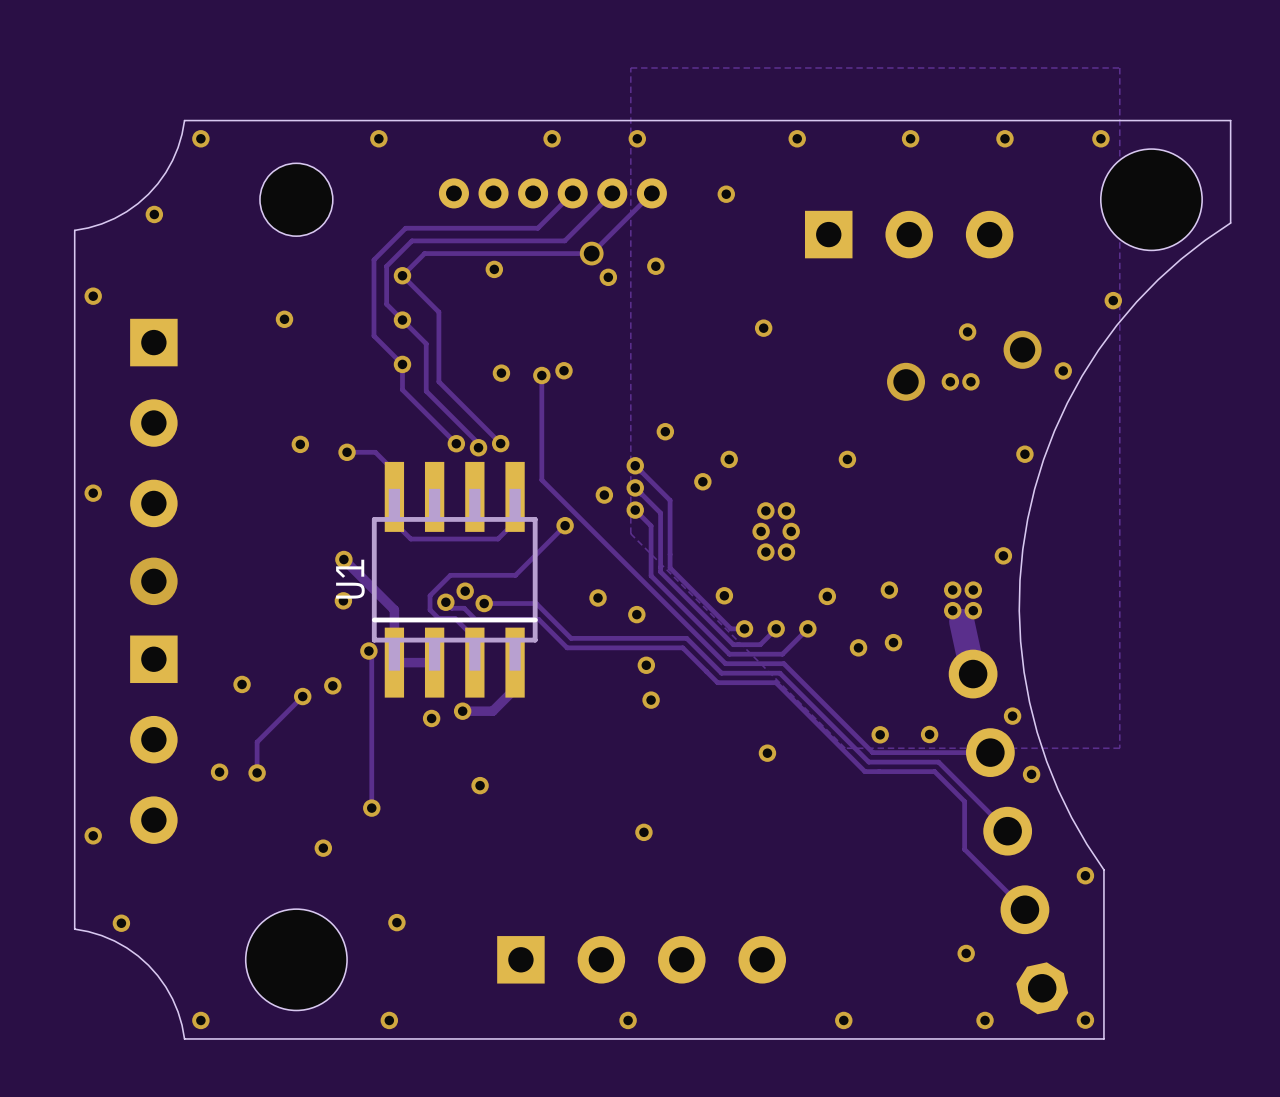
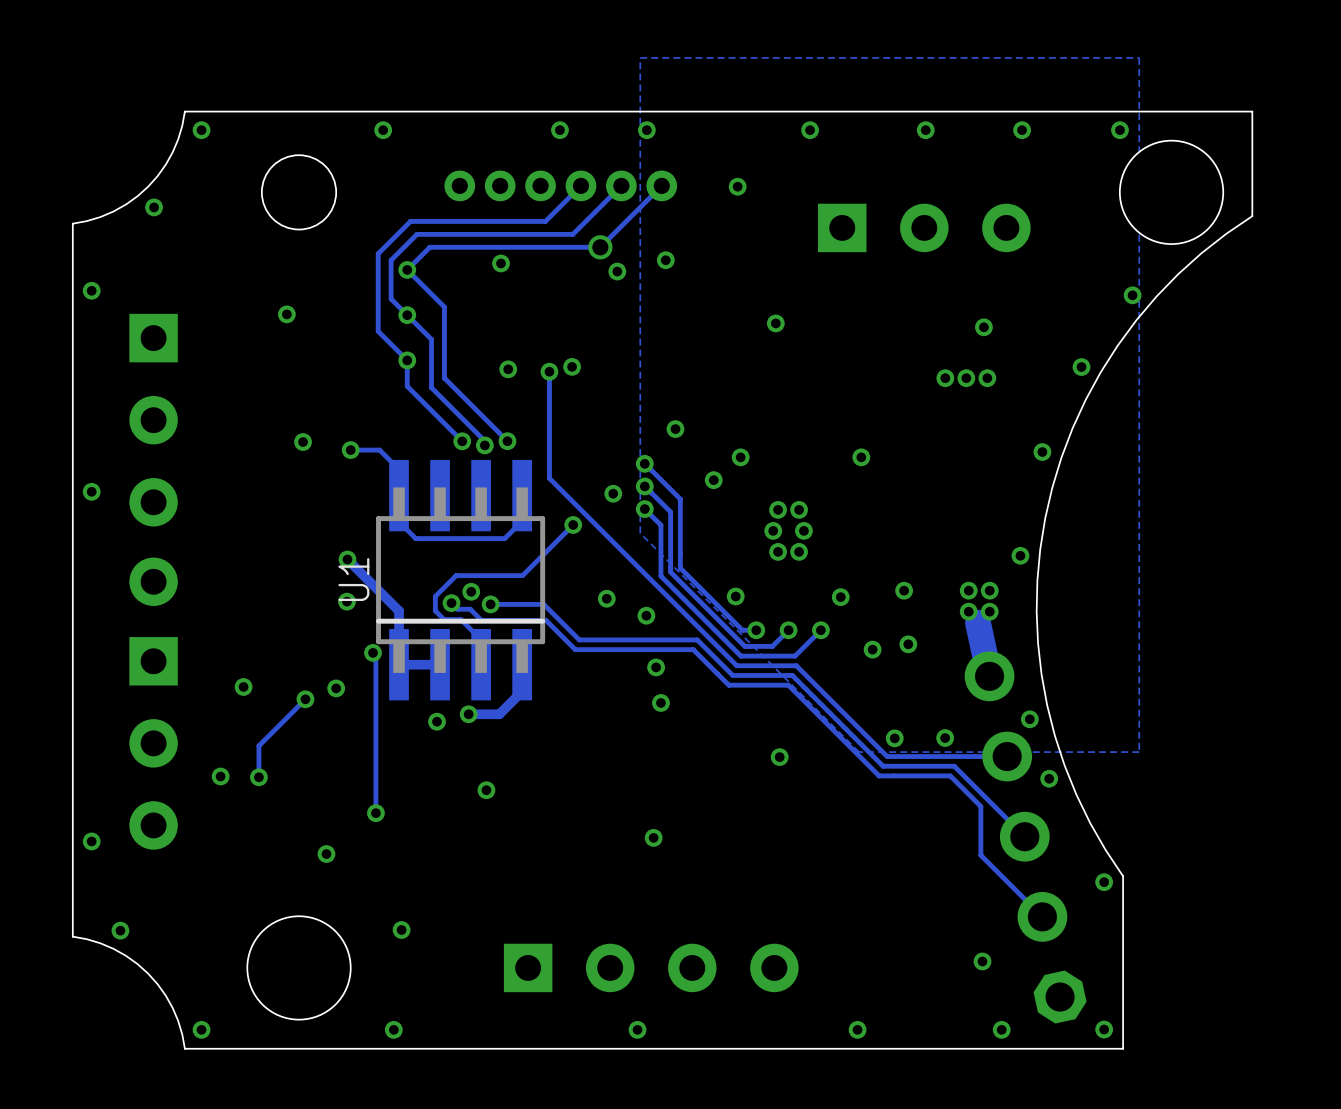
via: (1022, 349) -> none
via size: [887, 362, 926, 401] -> [936, 369, 955, 388]

